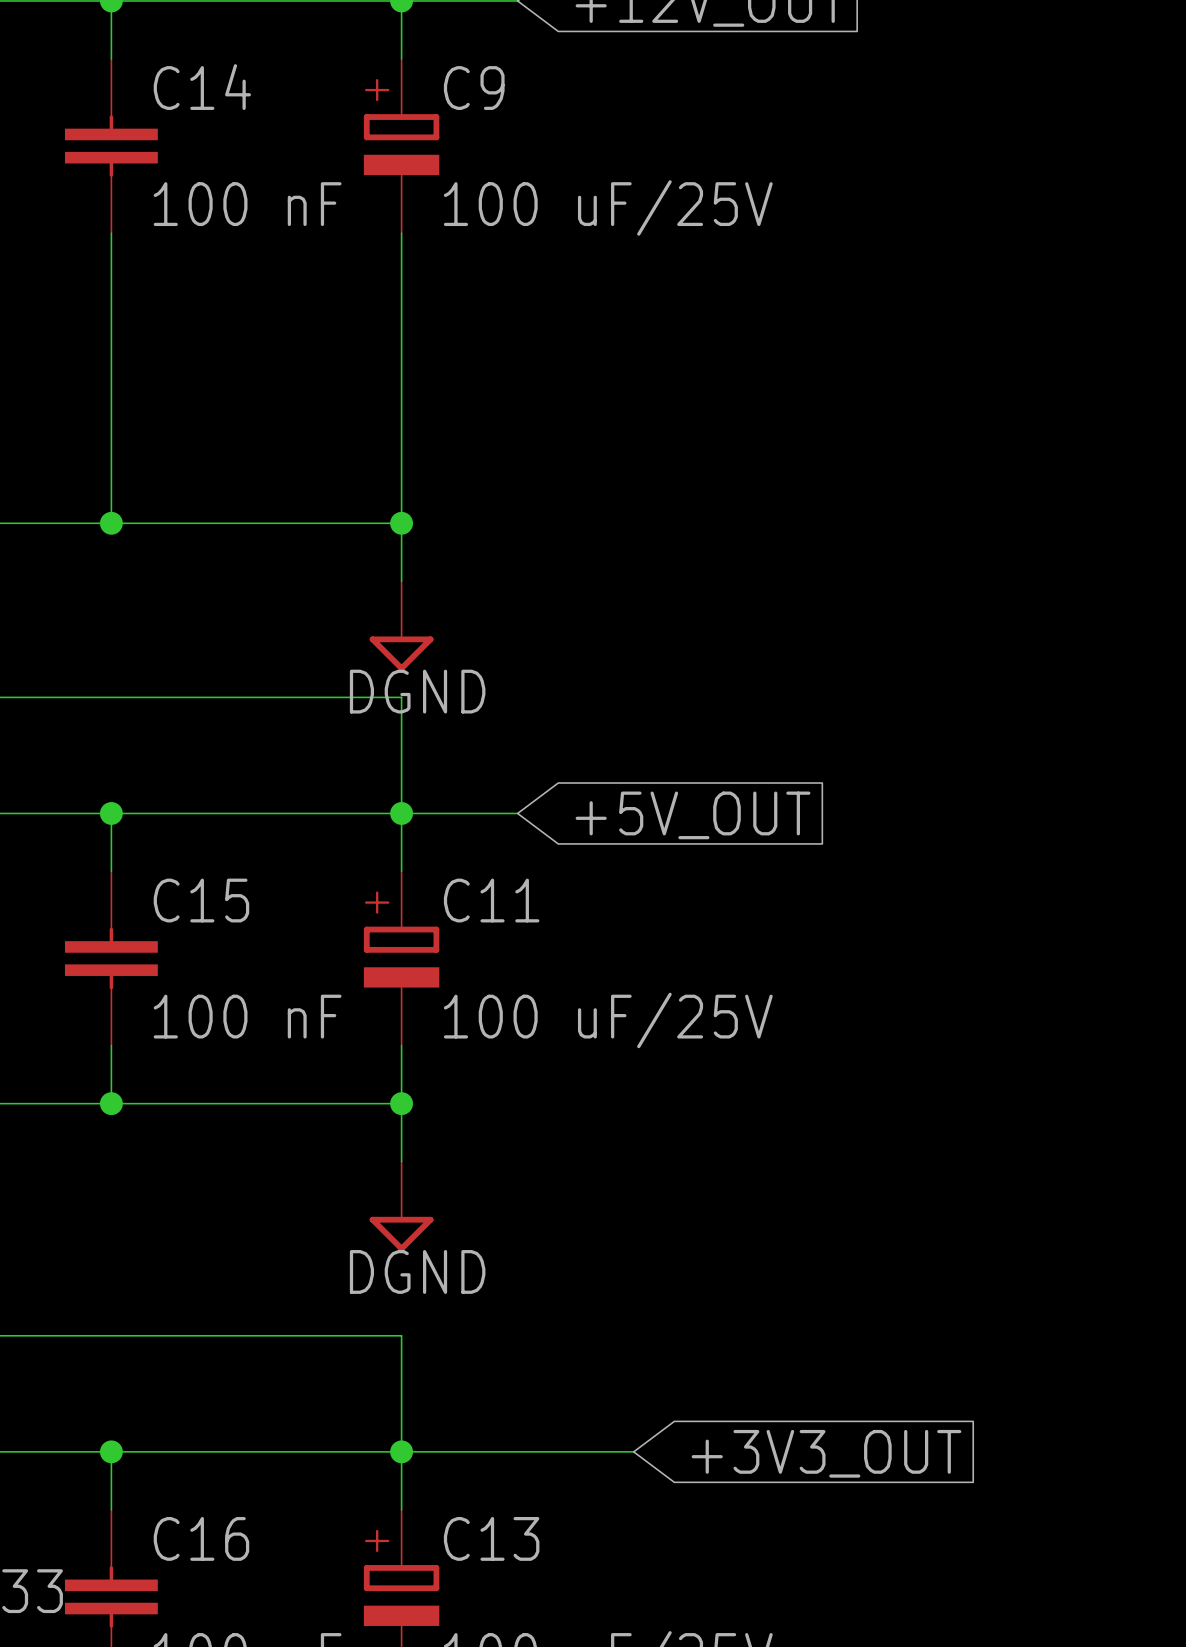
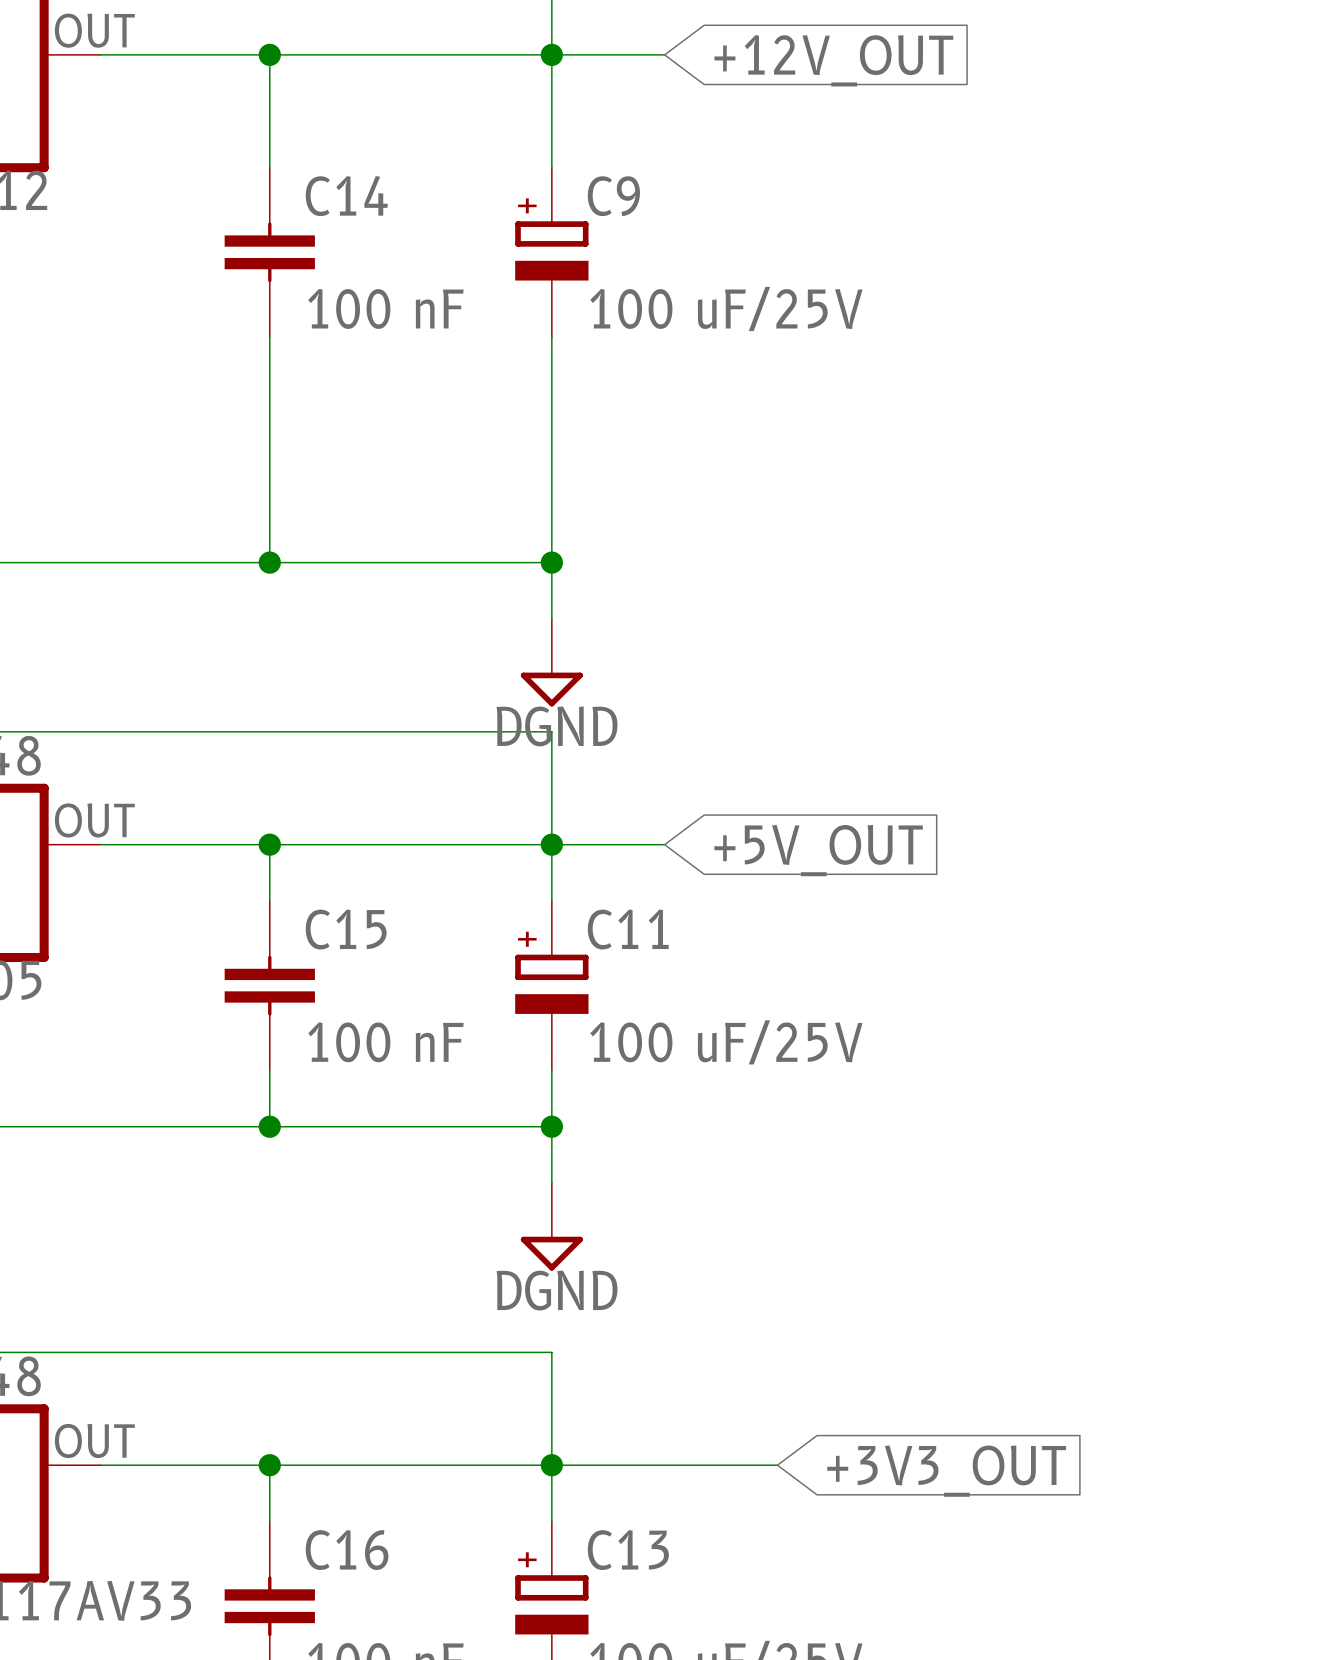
C14 position: (111, 146) -> (269, 252)
C9 position: (401, 146) -> (551, 252)

